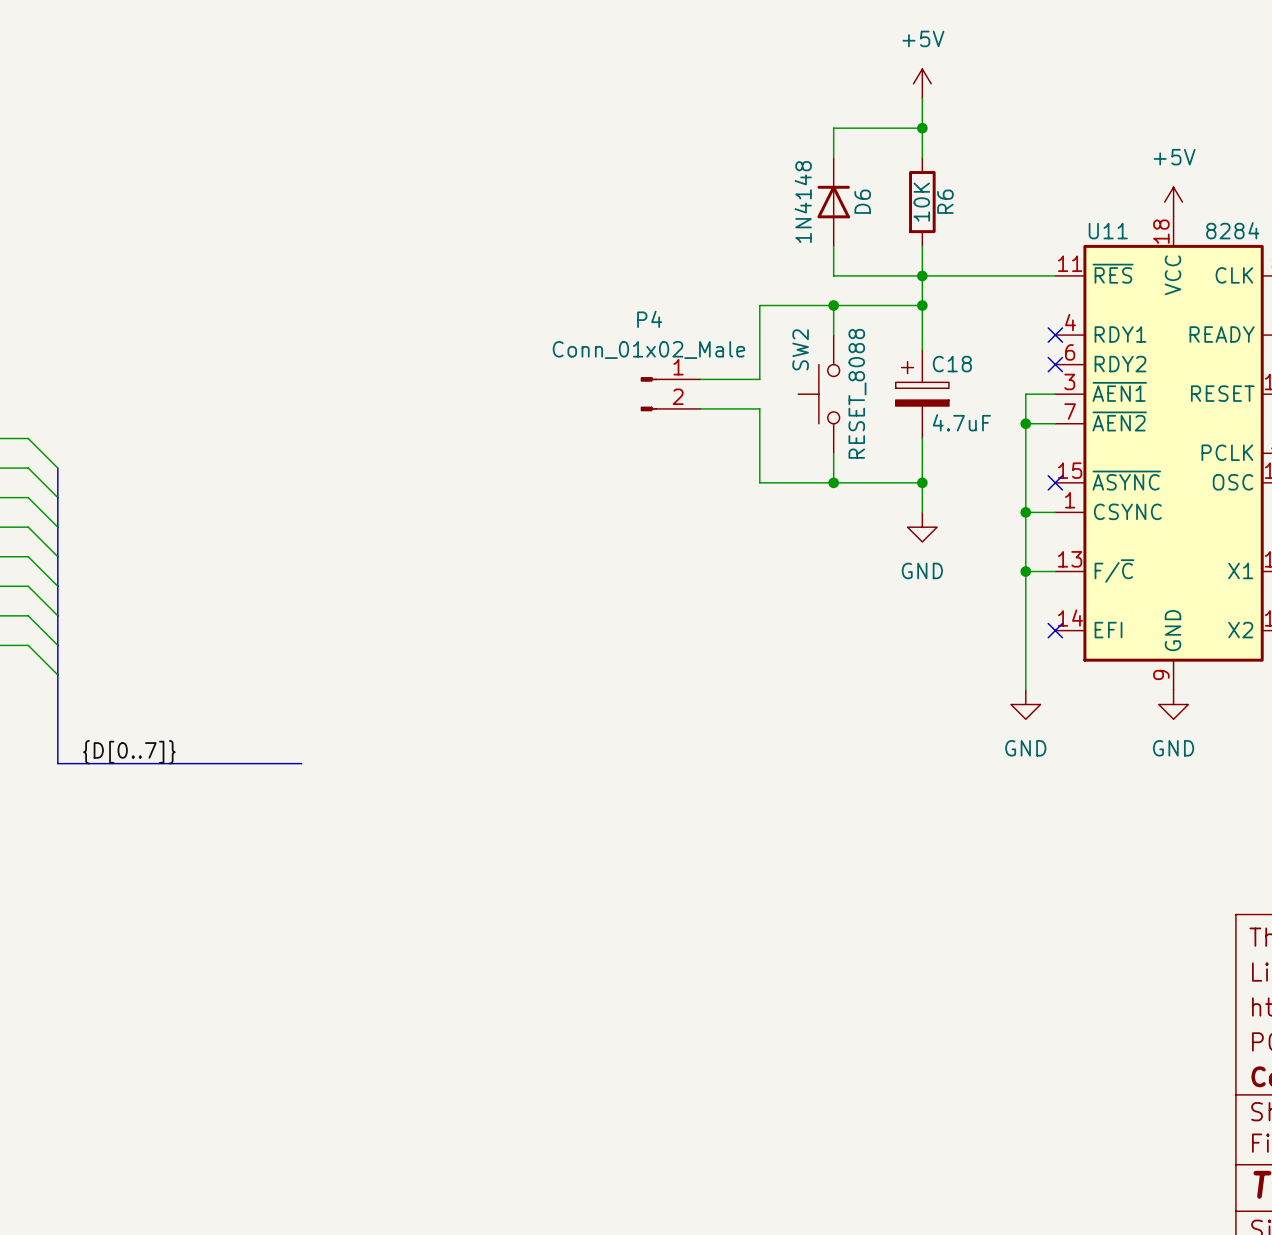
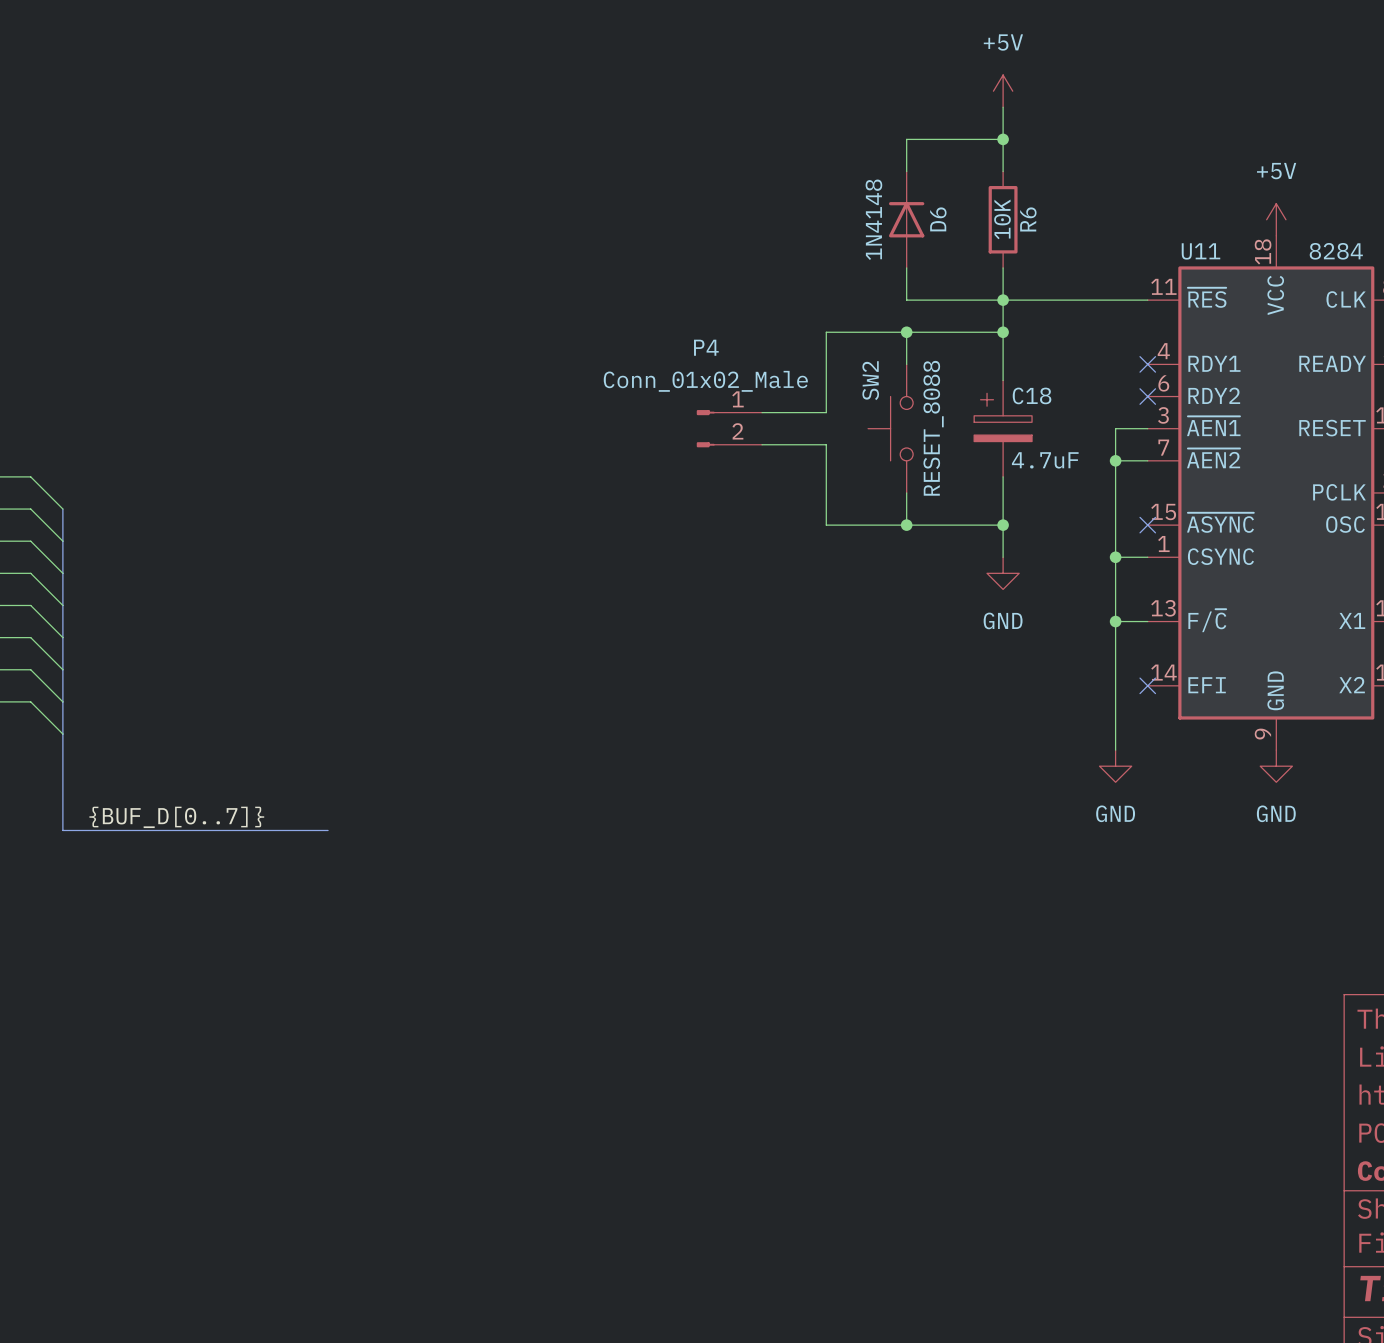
label: {D[0..7]} (129, 752) -> {BUF_D[0..7]} (176, 817)

